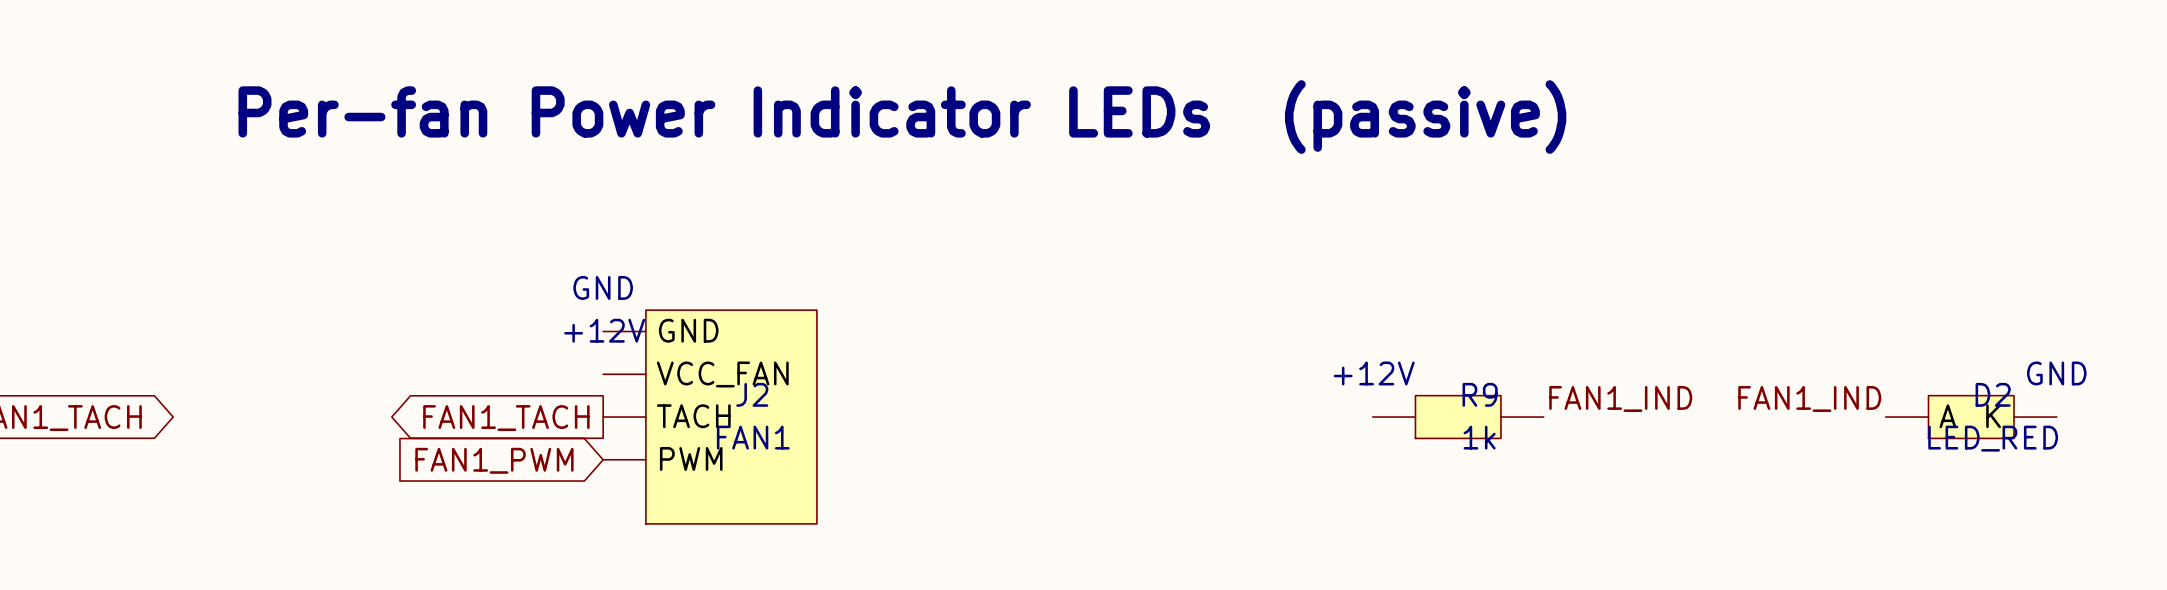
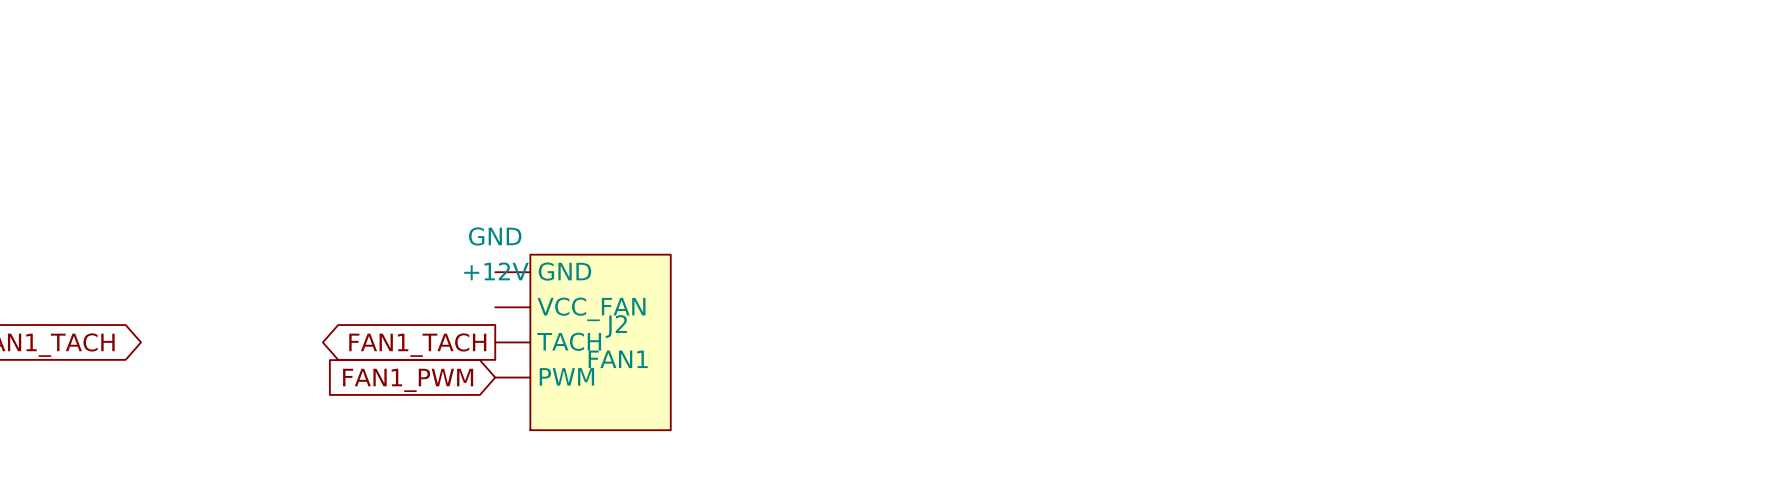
text: Per-fan Power Indicator LEDs (passive) (902, 117) -> none
power symbol: +12V (1374, 373) -> none
power symbol: GND (2056, 373) -> none
label: FAN1_IND (1620, 398) -> none
label: FAN1_IND (1809, 398) -> none
R9: 1k (1458, 417) -> none
D2: LED_RED (1971, 417) -> none

